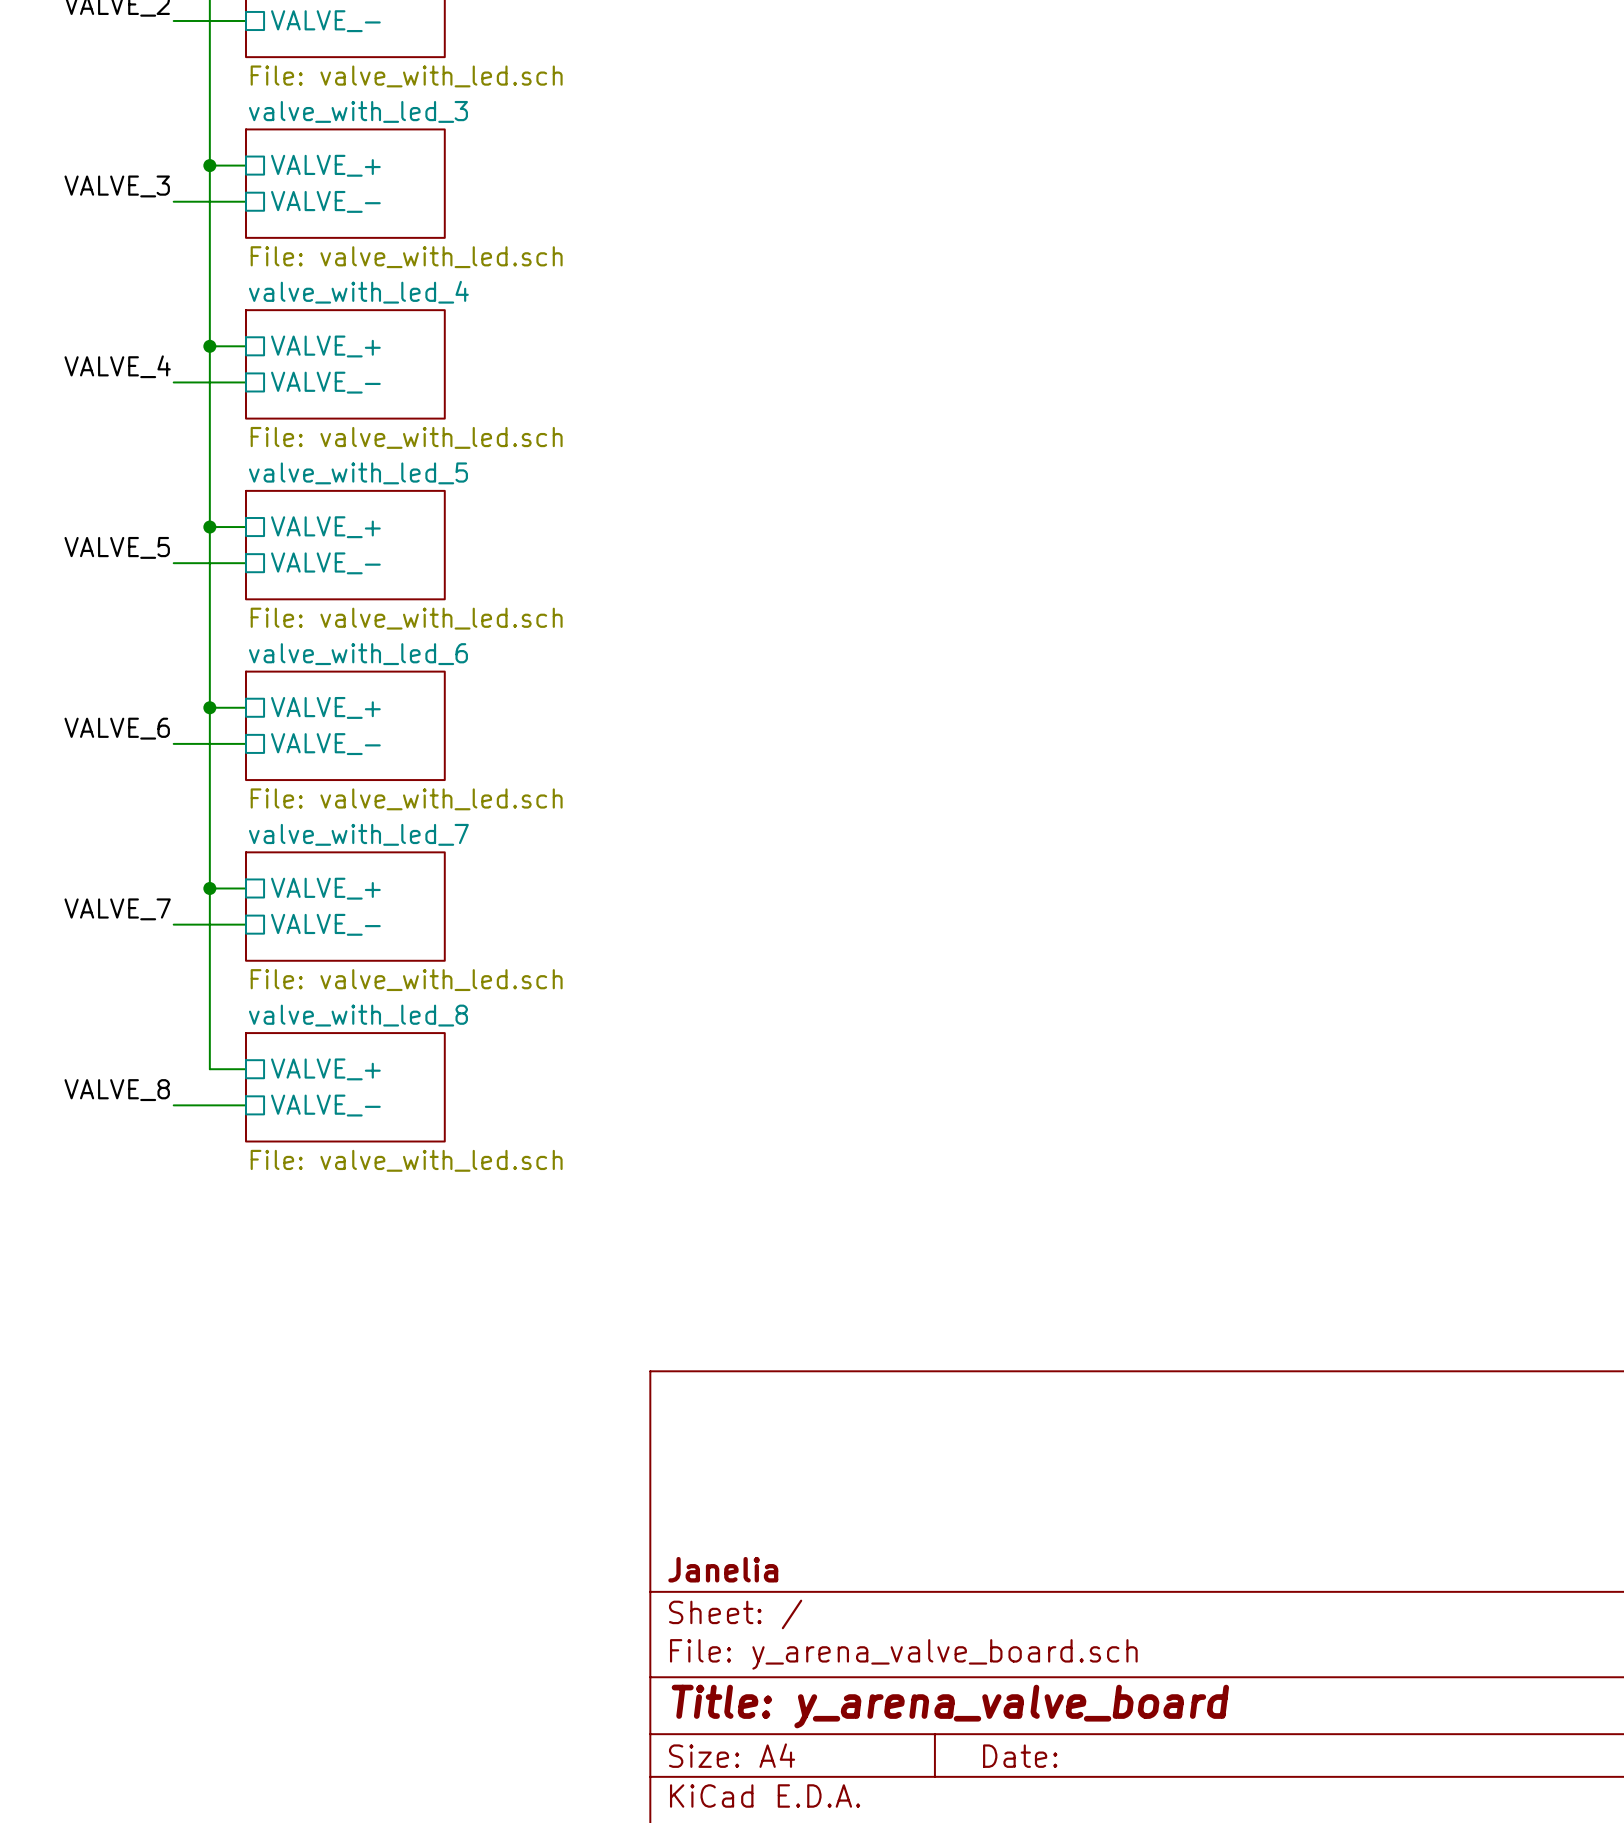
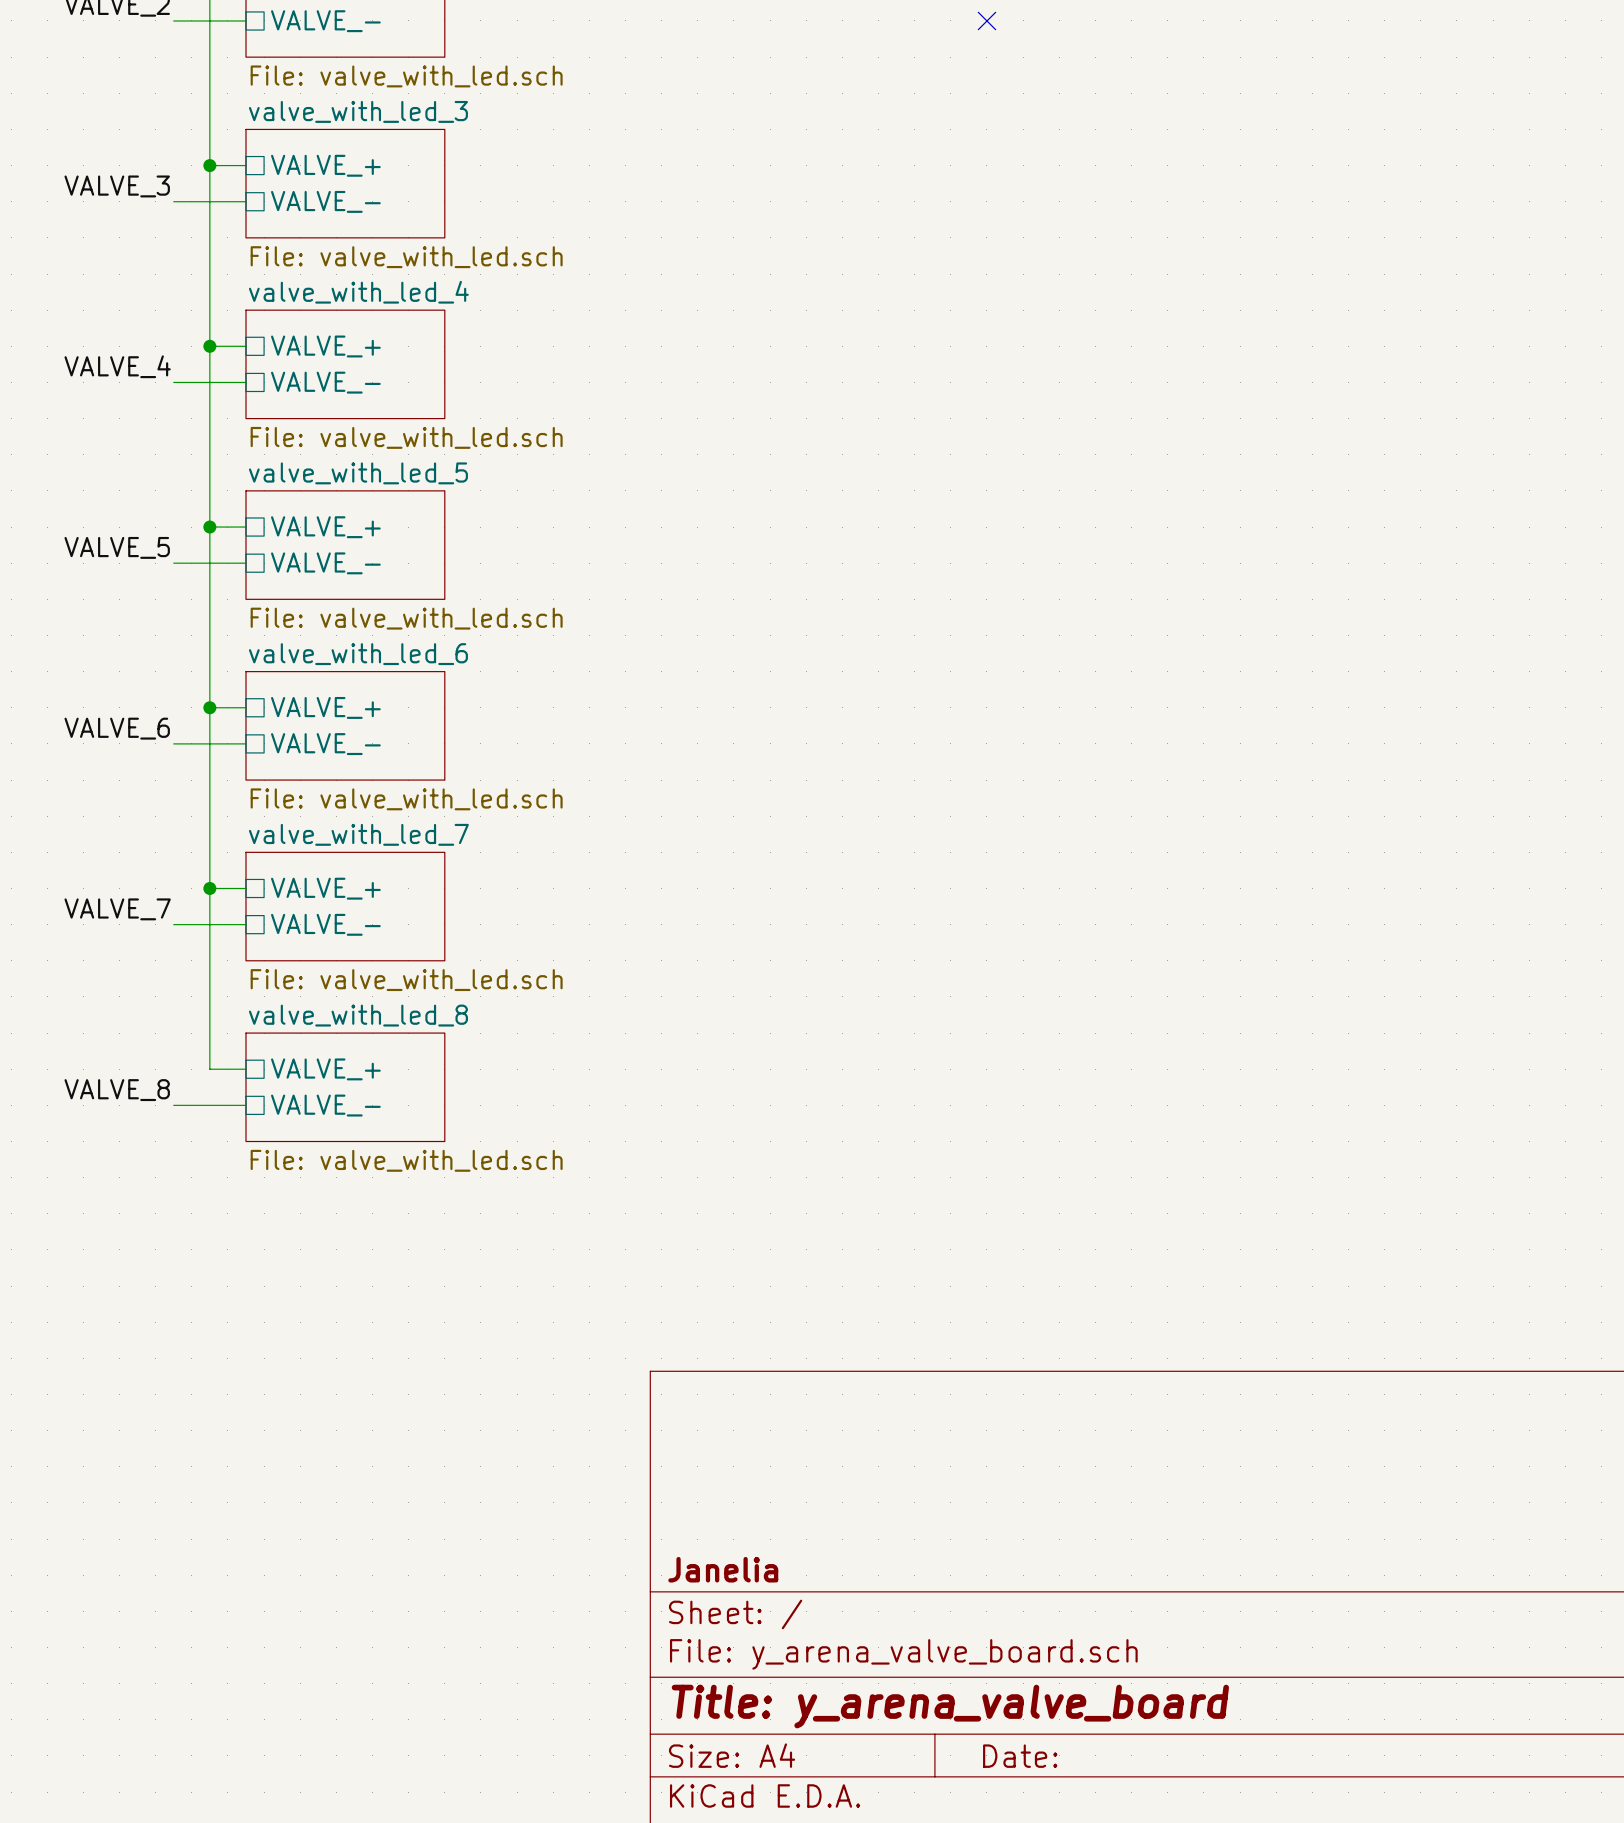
no-connect mark: none -> (986, 20)

